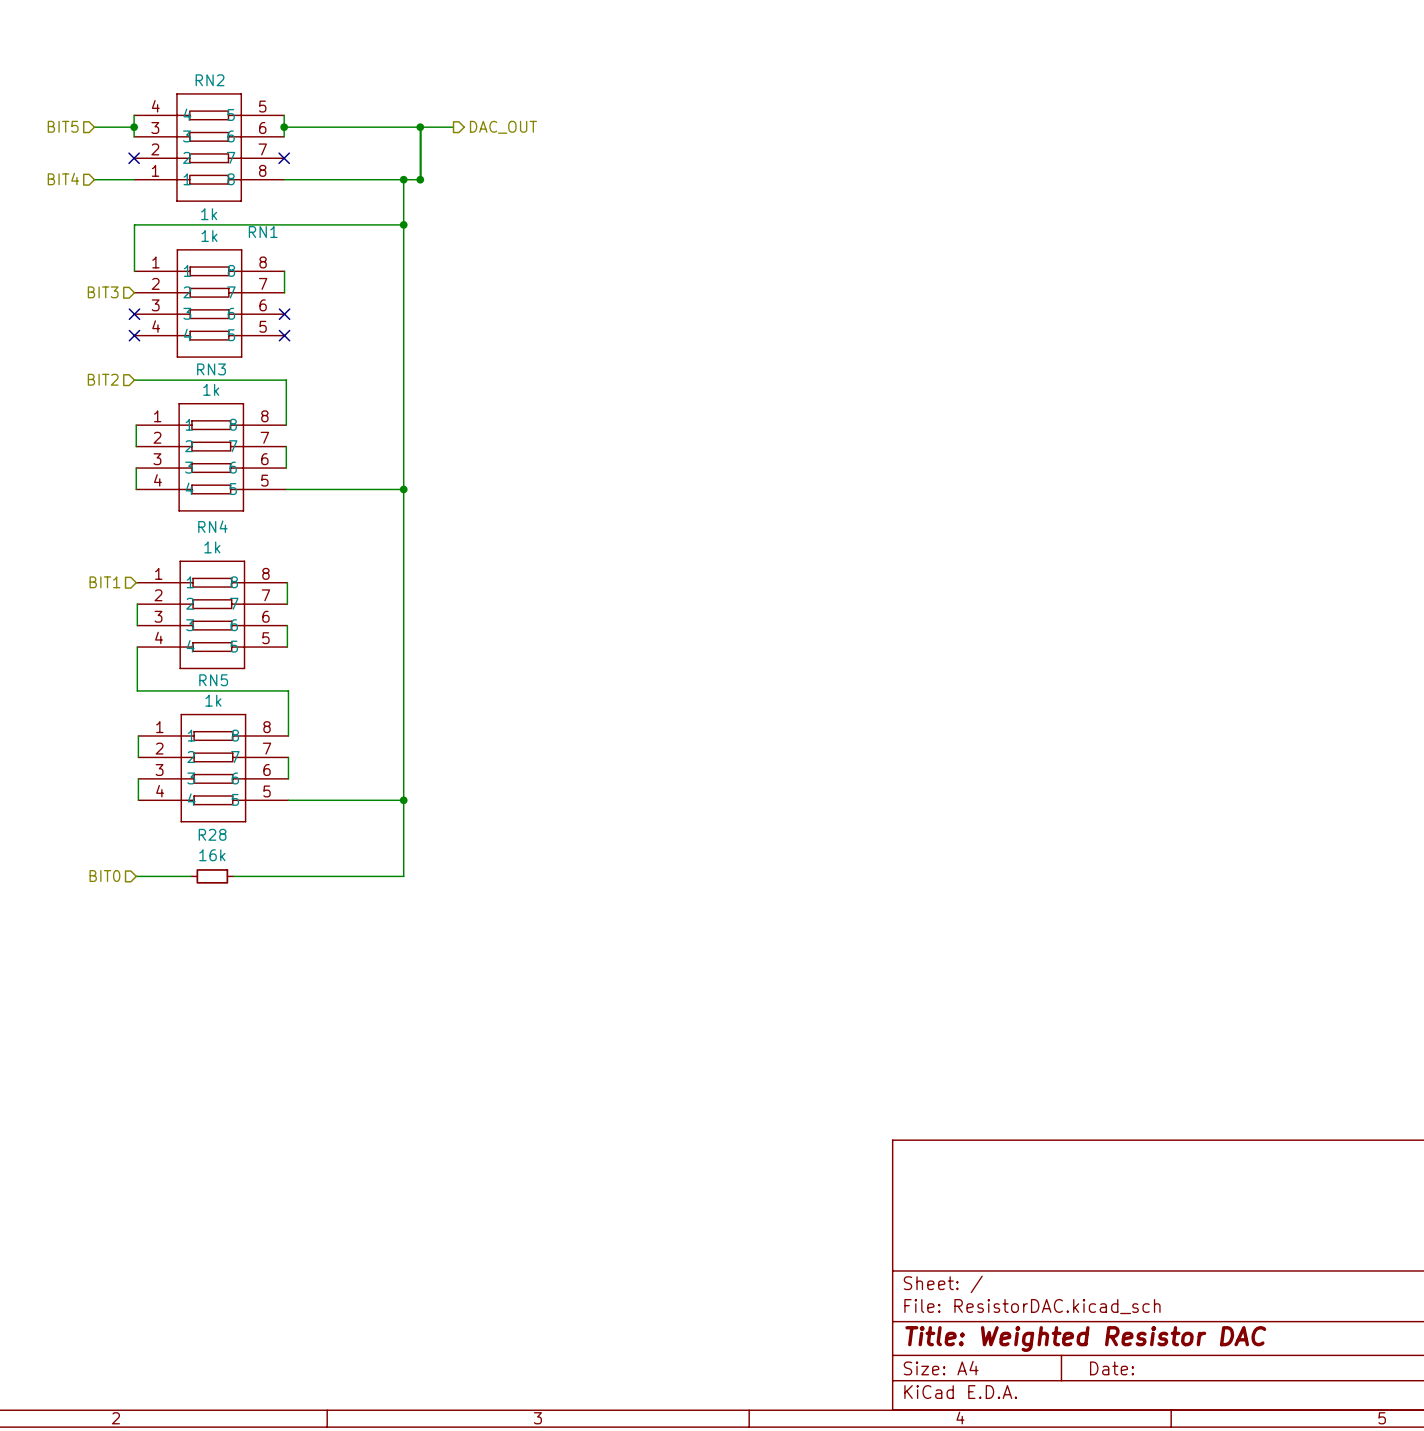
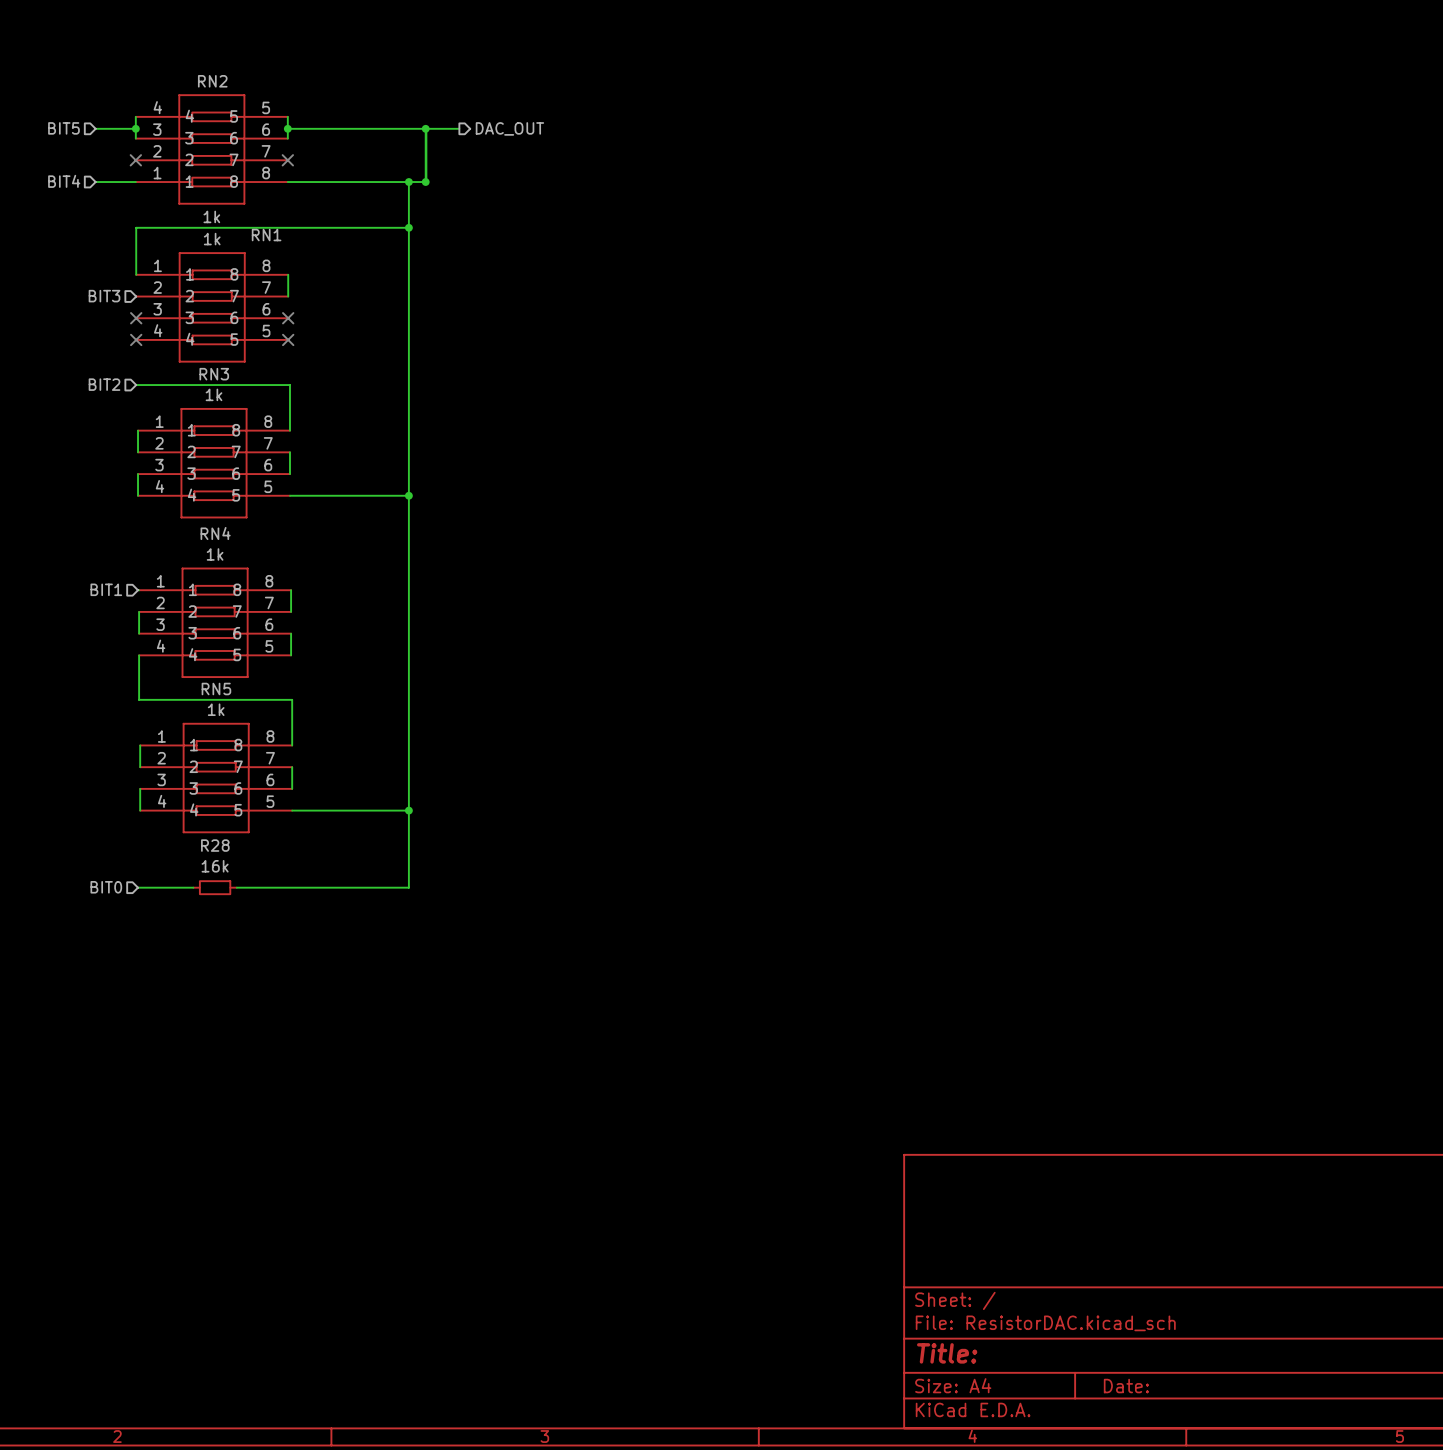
title block: Title: Weighted Resistor DAC (1085, 1339) -> Title: (947, 1353)

